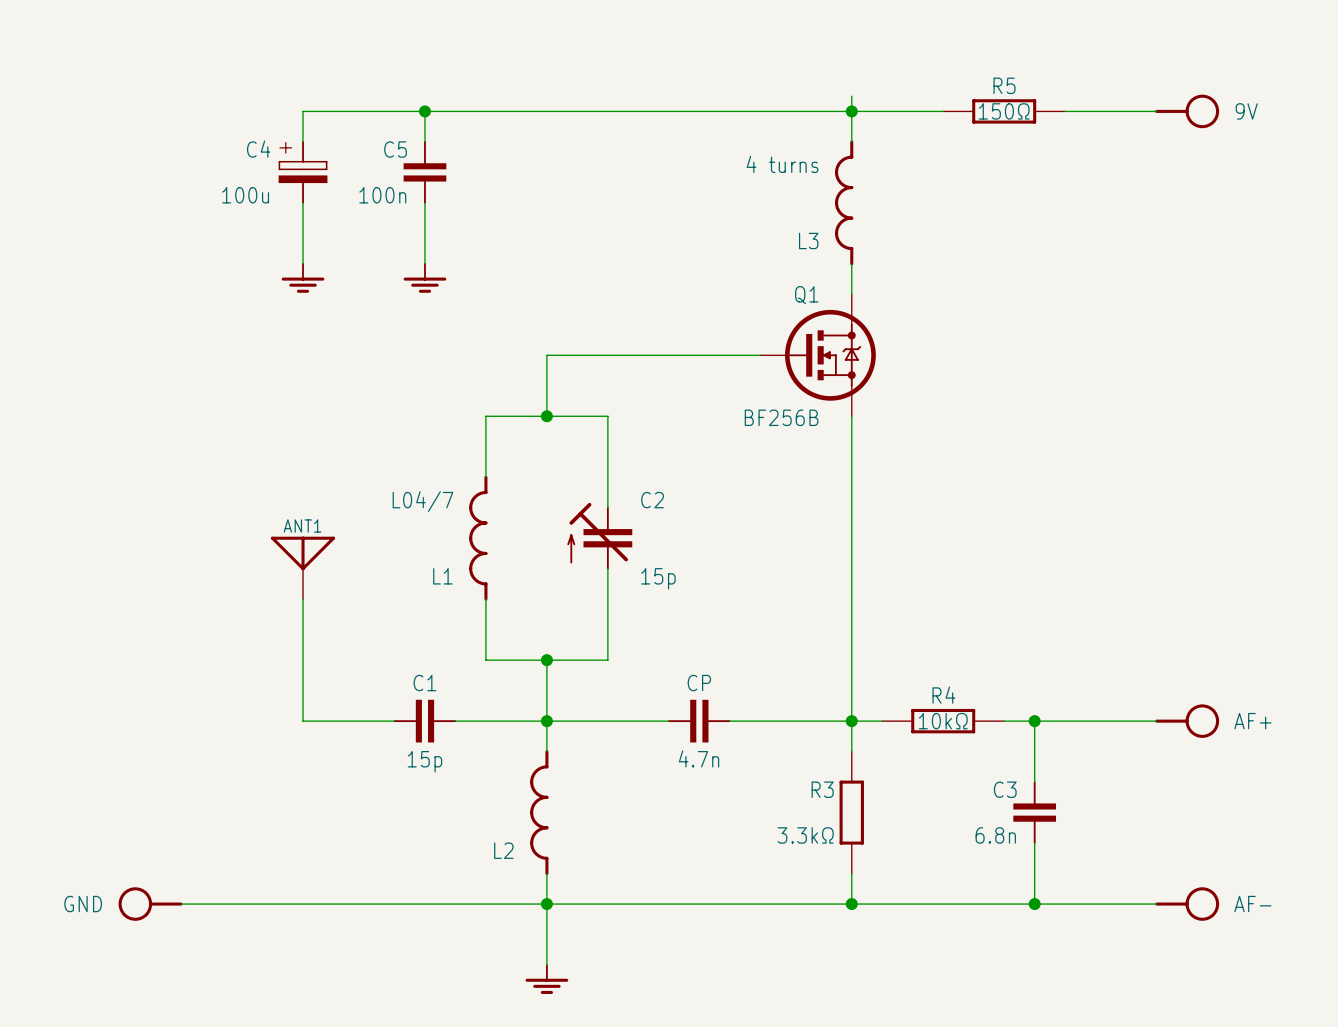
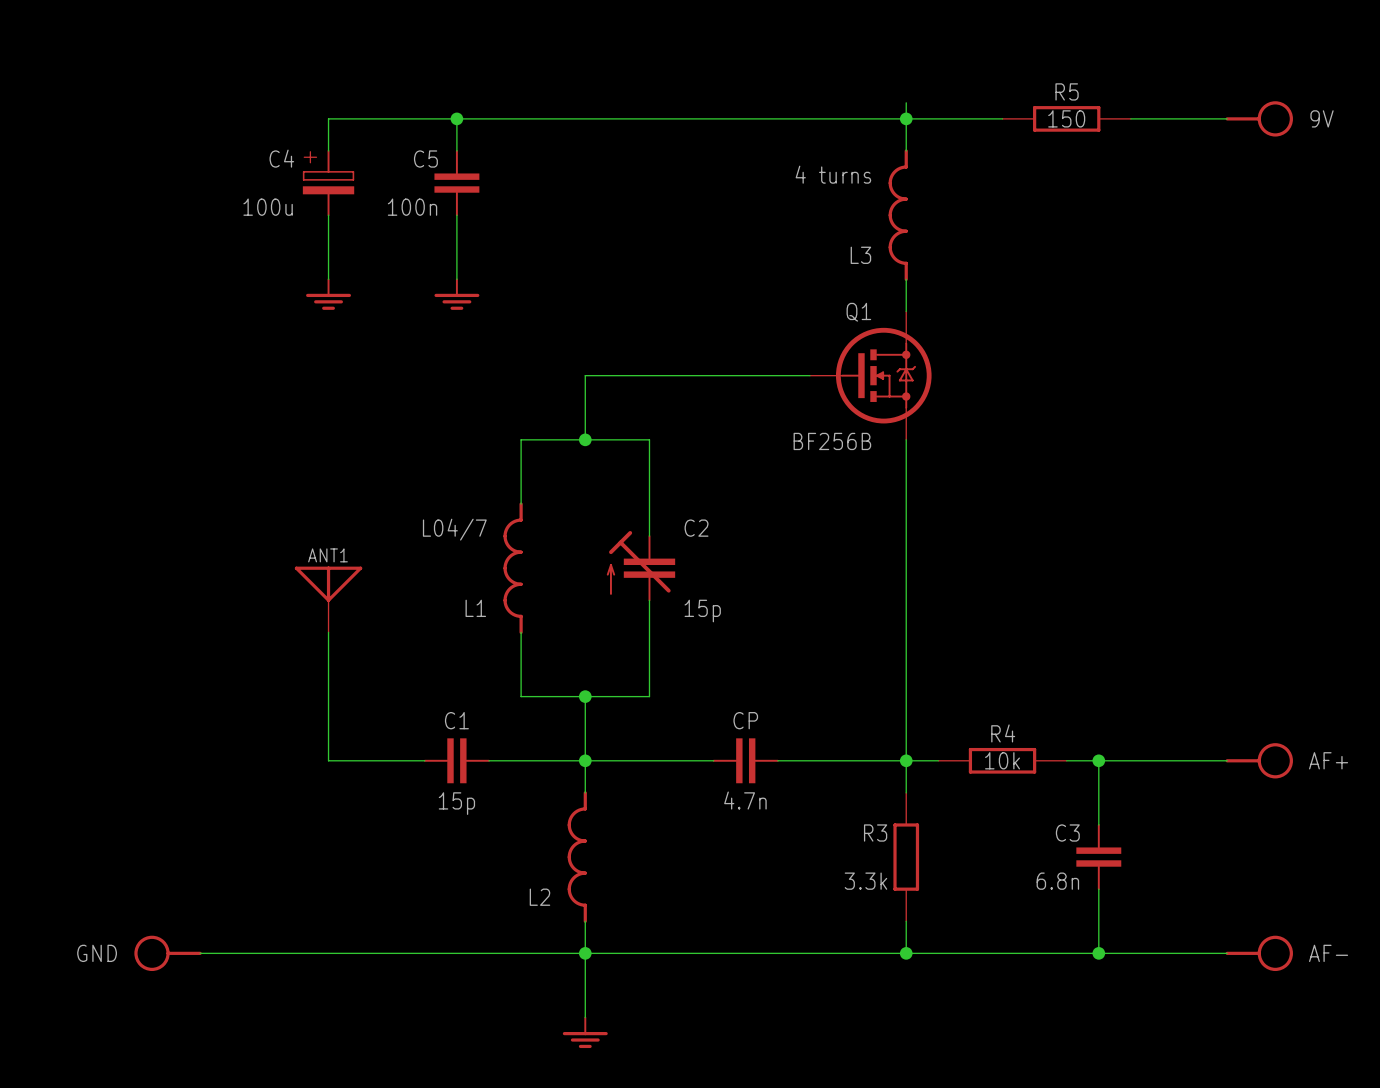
R5 value: 150Ω (1004, 111) -> 150 (1066, 118)
R4 value: 10kΩ (943, 721) -> 10k (1002, 760)
R3 value: 3.3kΩ (805, 835) -> 3.3k (865, 881)

